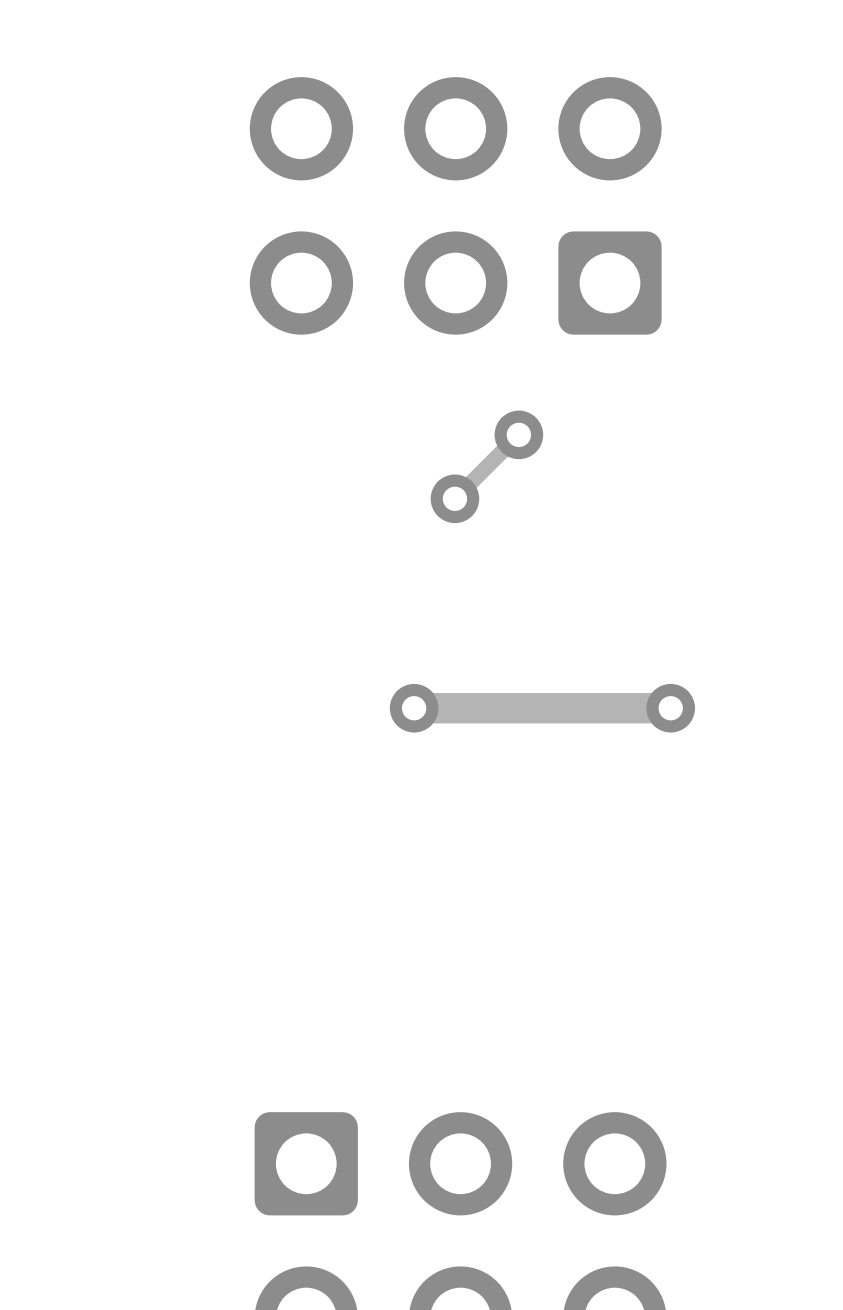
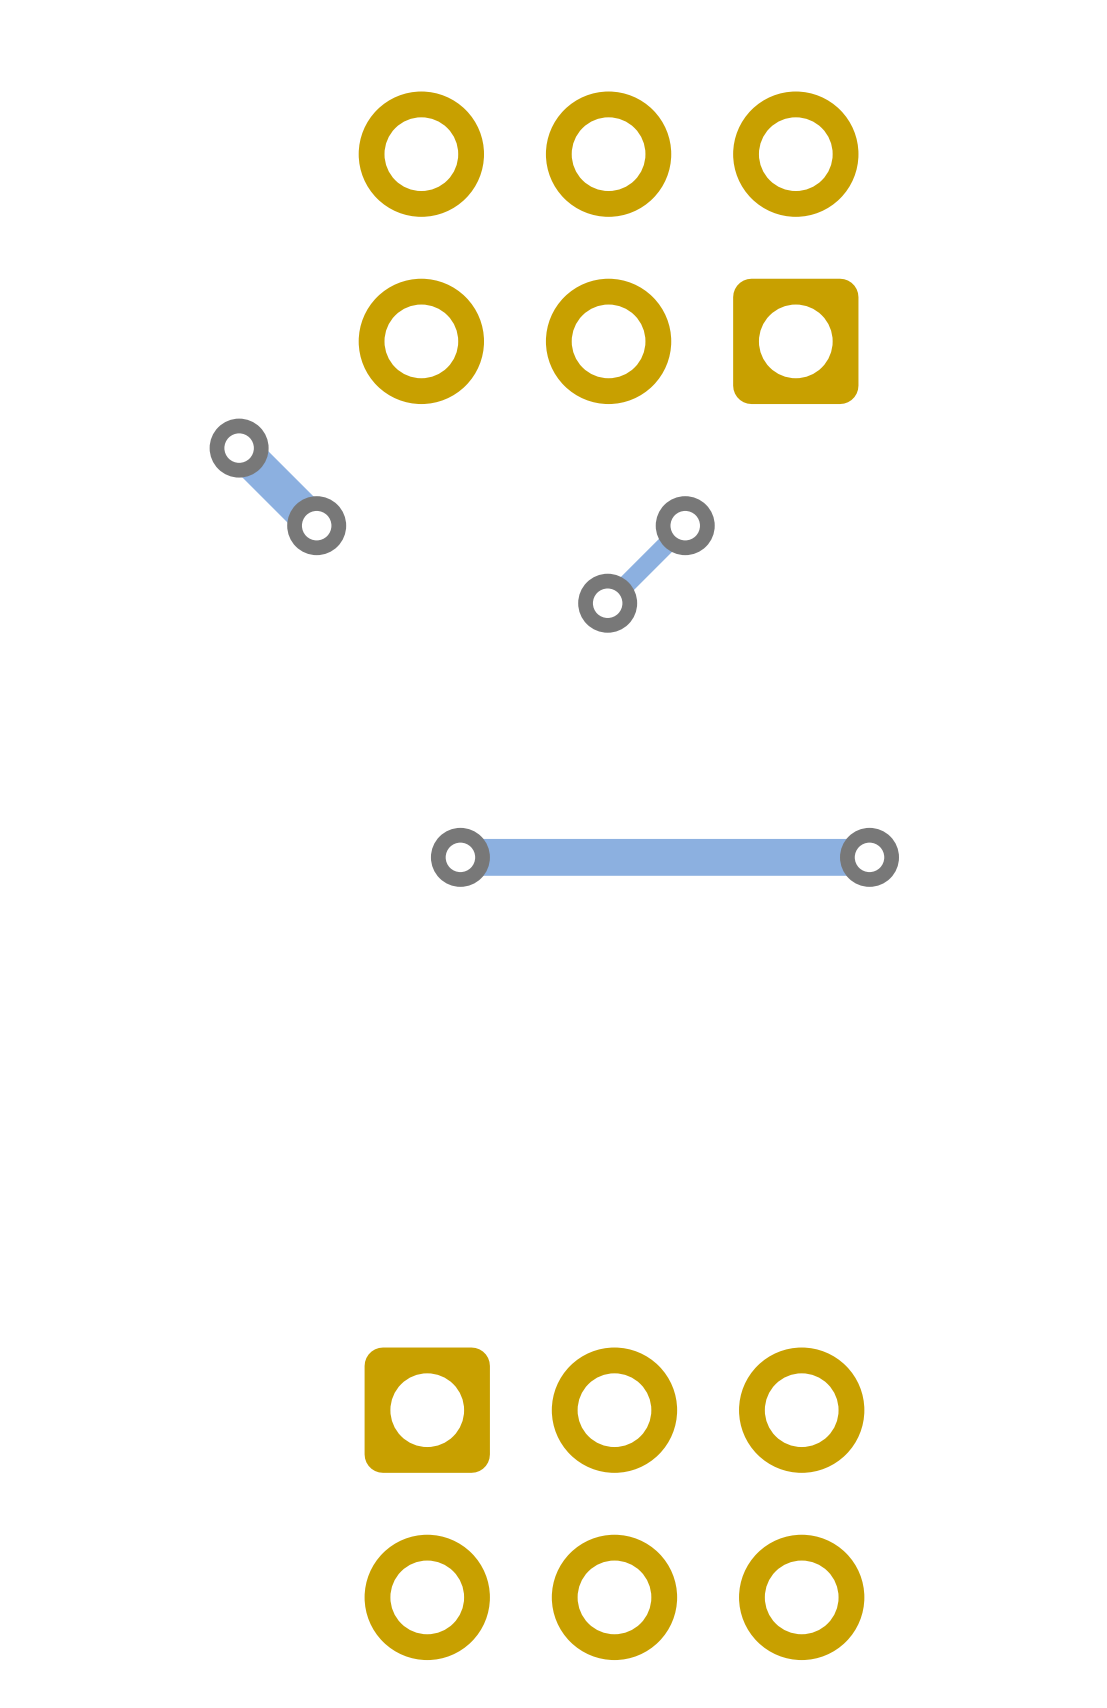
track: none -> (239, 448) (316, 525)
via: none -> (239, 448)
via: none -> (316, 525)
track: none -> (558, 857) (460, 857)
via position: (414, 708) -> (460, 857)

